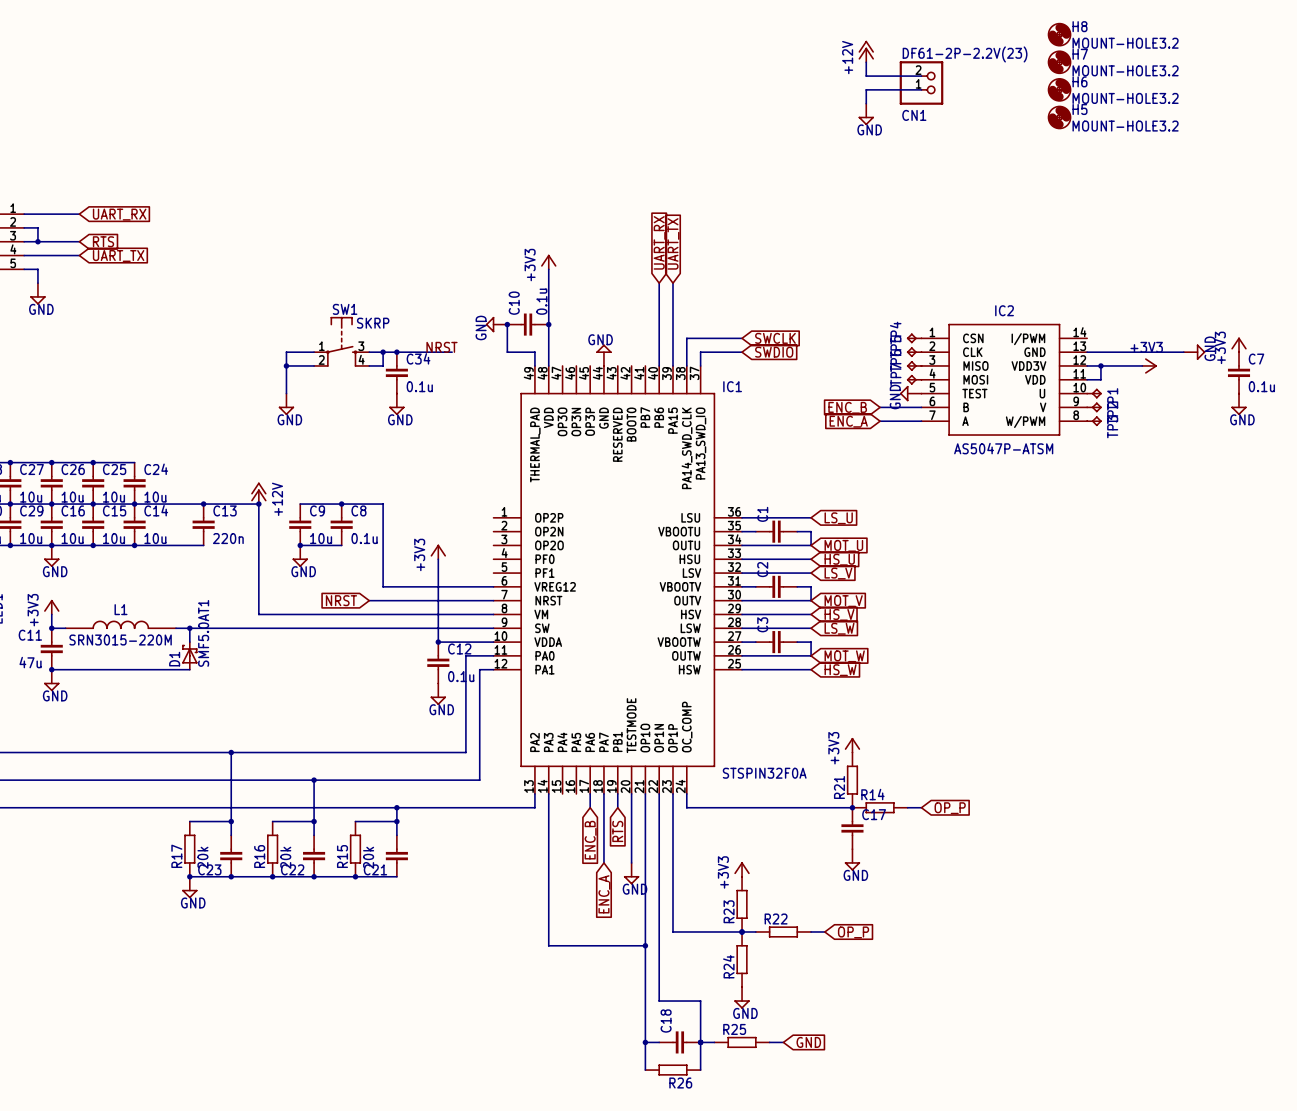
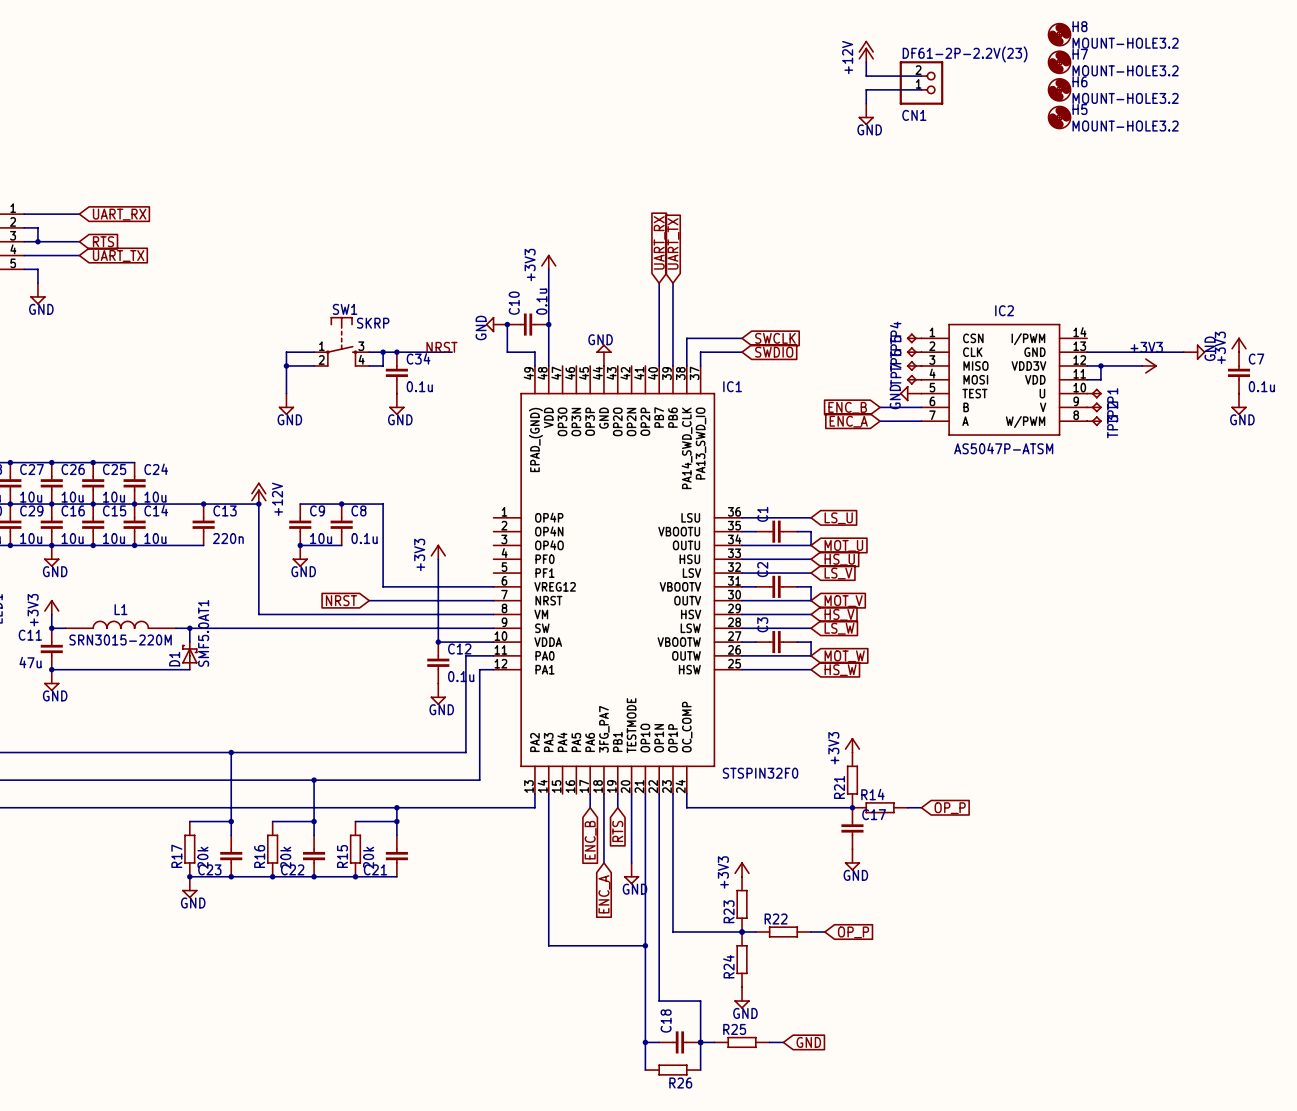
IC1 symbol: [493, 365, 743, 794] -> [493, 365, 743, 794]
IC1 value: STSPIN32F0A (764, 773) -> STSPIN32F0 (760, 773)

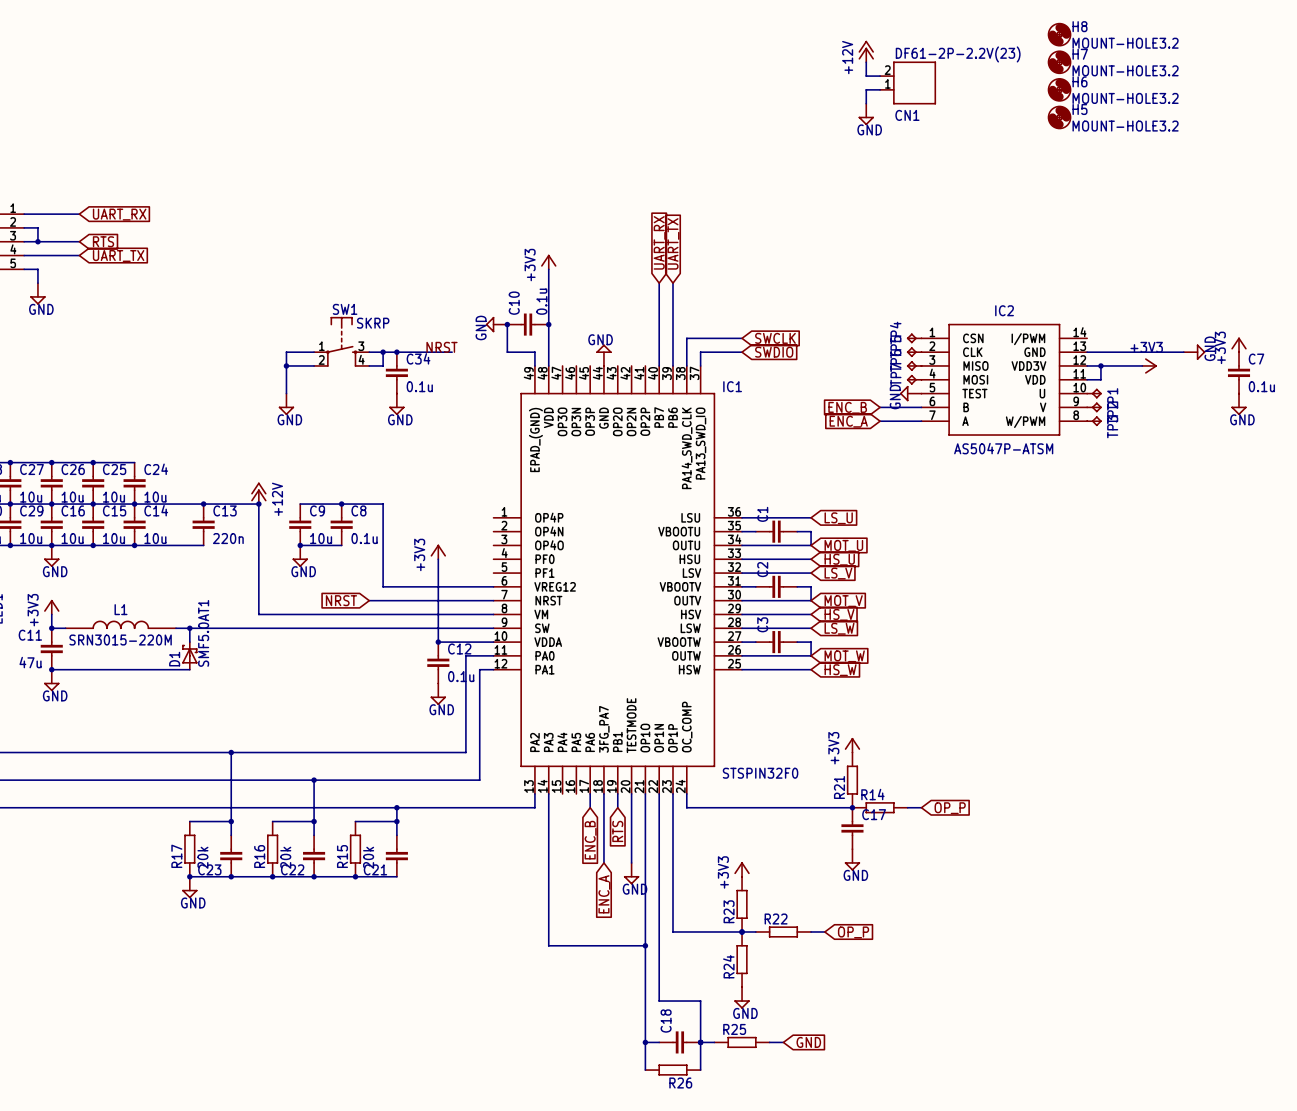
CN1 symbol: [899, 61, 944, 105] -> [880, 61, 936, 105]
wire: (880, 76) (921, 76) -> none
wire: (880, 89) (921, 89) -> none

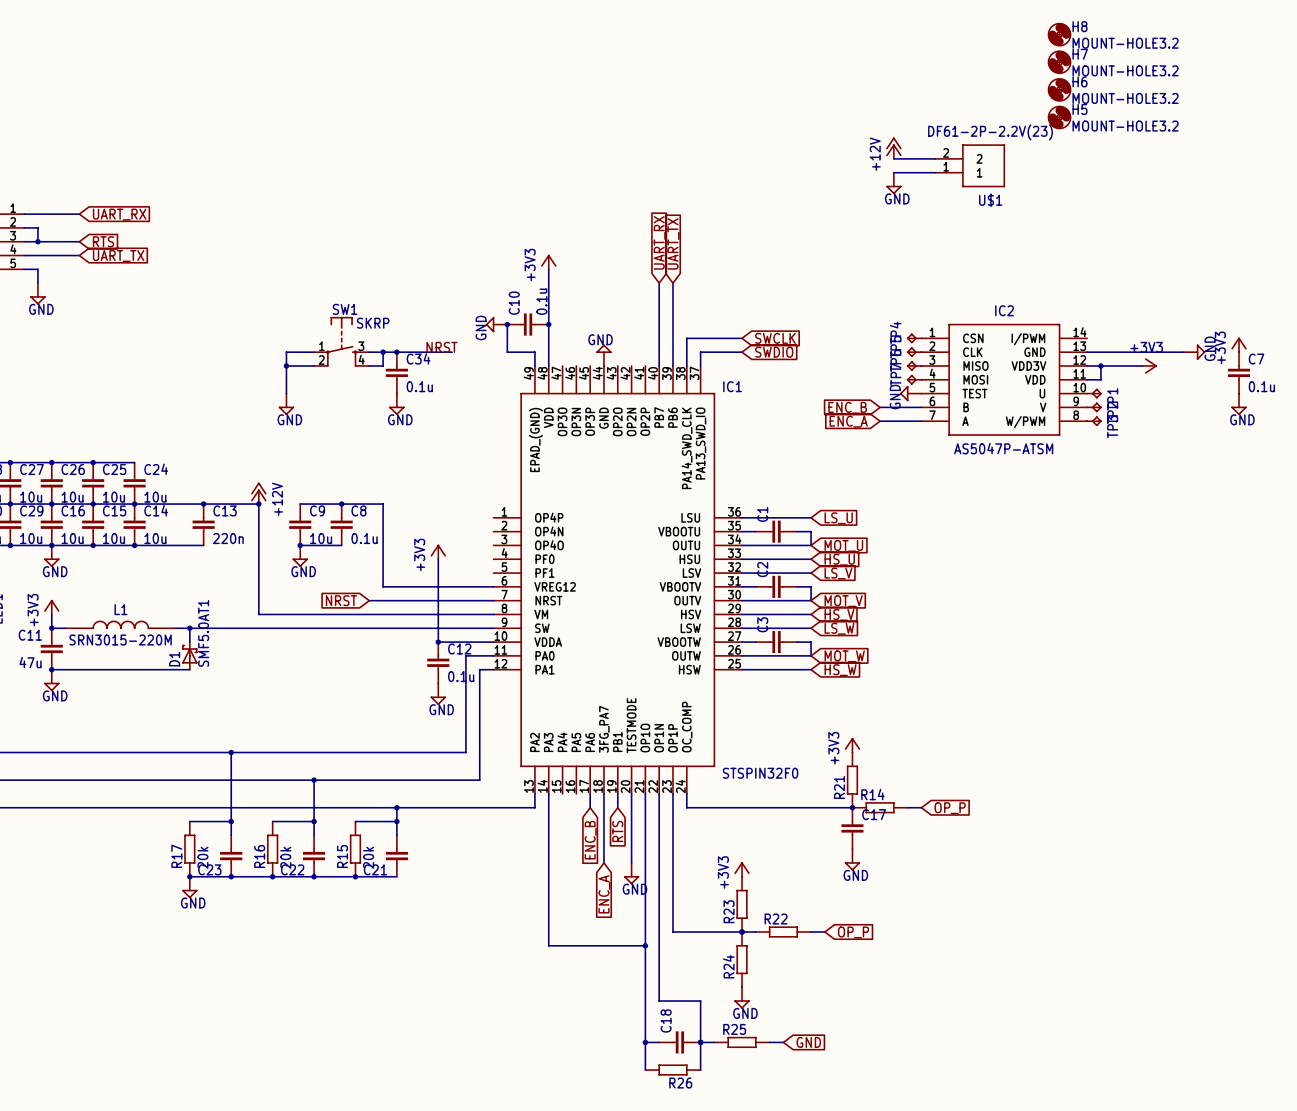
power symbol position: +12V (866, 51) -> +12V (893, 148)
wire: (866, 62) (866, 76) (880, 76) -> none
CN1: DF61-2P-2.2V(23) (908, 82) -> none
wire: (880, 89) (866, 89) (866, 103) -> none
power symbol position: GND (866, 114) -> GND (893, 183)
wire: none -> (893, 158) (935, 158)
U$1: none -> DF61-2P-2.2V(23) (970, 165)
wire: none -> (893, 172) (935, 172)

